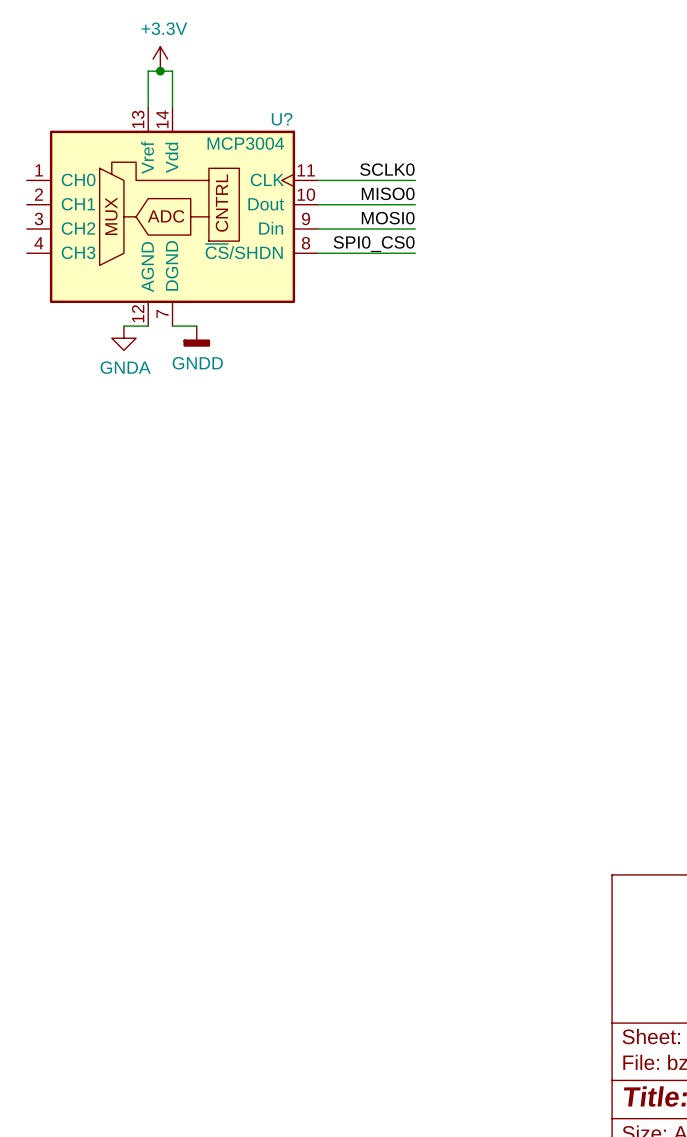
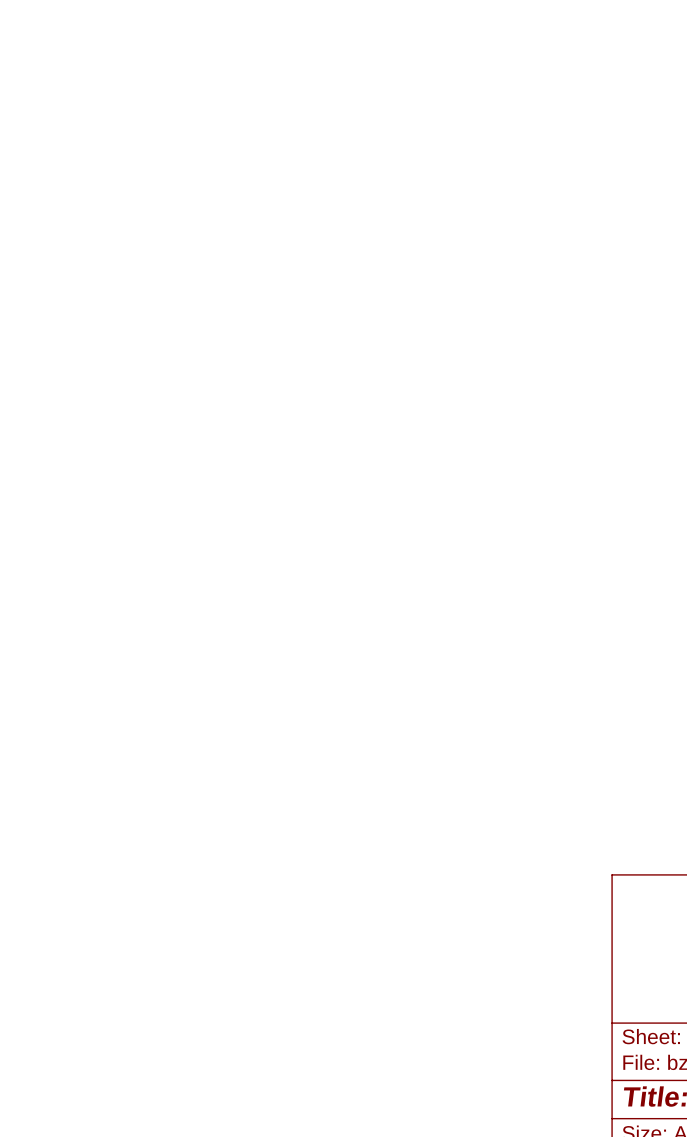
power symbol: +3.3V (160, 59) -> none
junction: (160, 71) -> none
wire: (148, 107) (148, 71) (172, 71) (172, 107) -> none
label: SCLK0 (387, 169) -> none
wire: (318, 180) (415, 180) -> none
label: MISO0 (388, 193) -> none
wire: (318, 204) (415, 204) -> none
U?: MCP3004 (172, 216) -> none
label: MOSI0 (388, 218) -> none
wire: (318, 228) (415, 228) -> none
label: SPI0_CS0 (374, 244) -> none
wire: (318, 253) (415, 253) -> none
wire: (123, 326) (148, 326) -> none
wire: (172, 326) (196, 326) -> none
power symbol: GNDD (196, 336) -> none
power symbol: GNDA (123, 338) -> none

